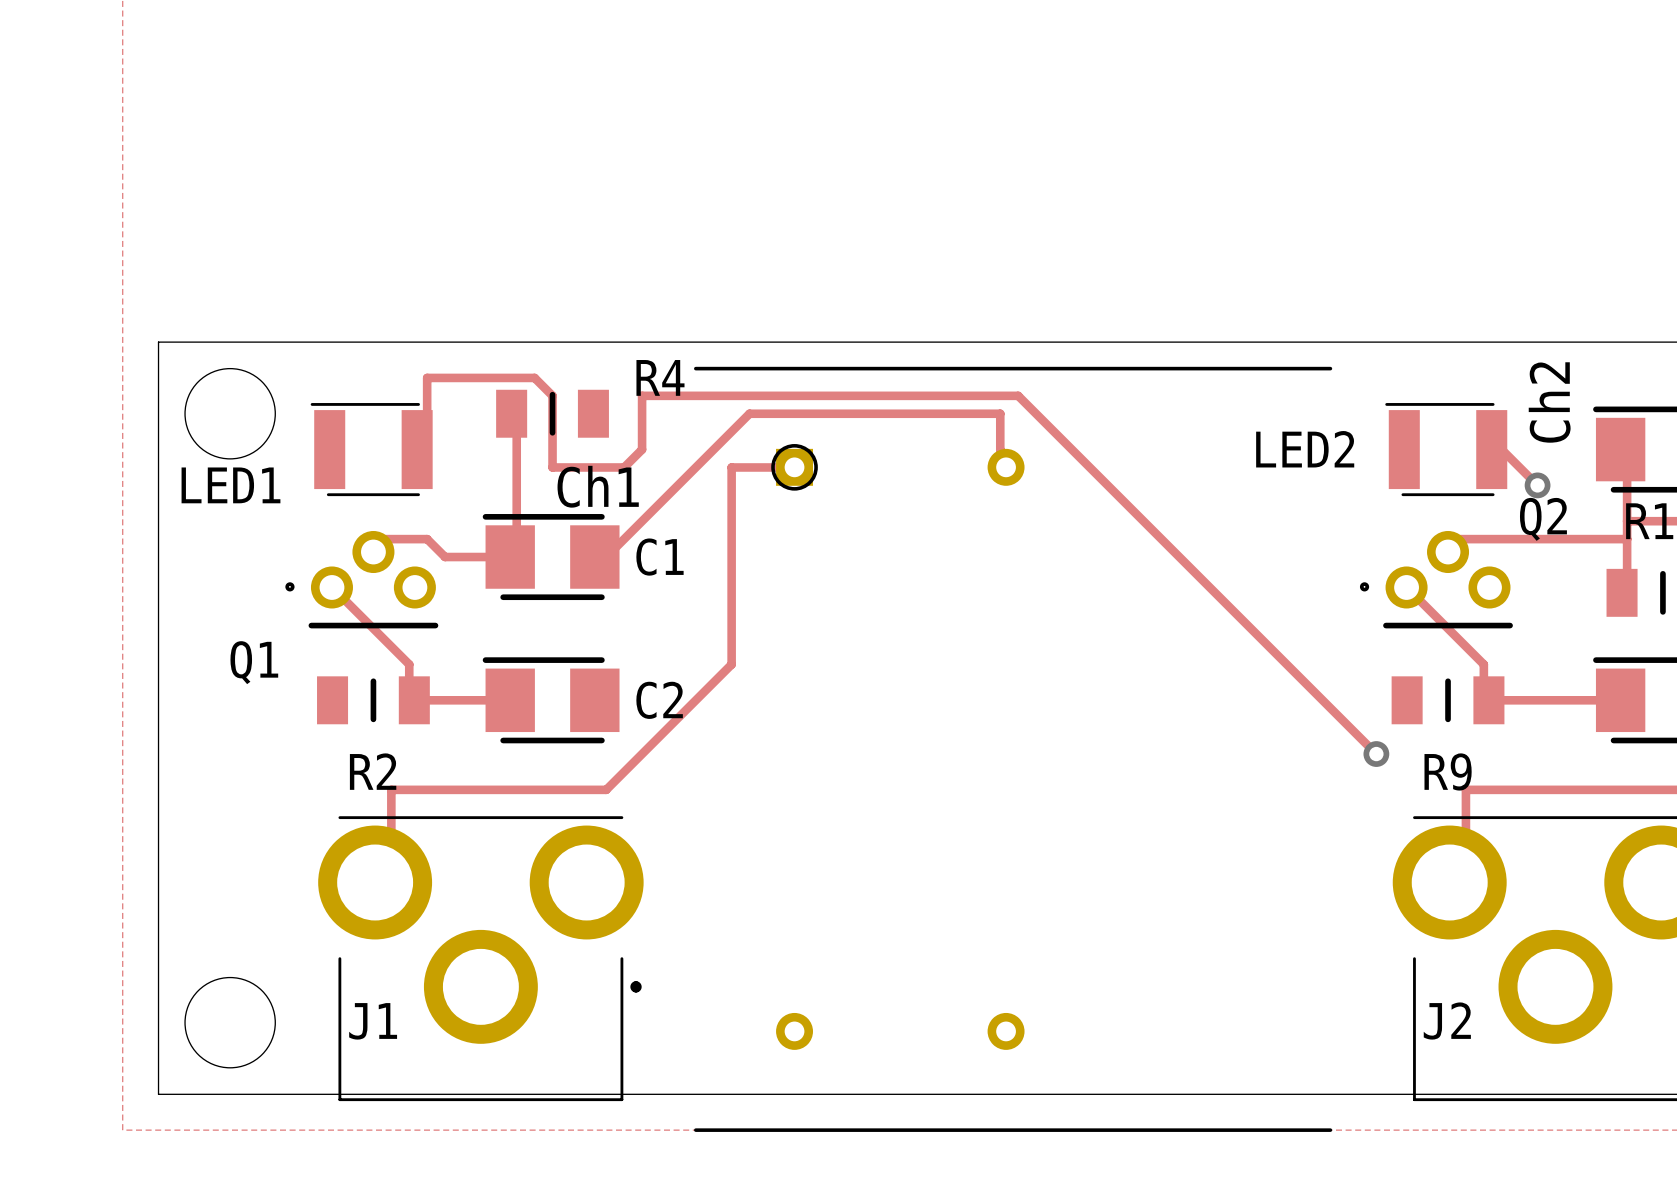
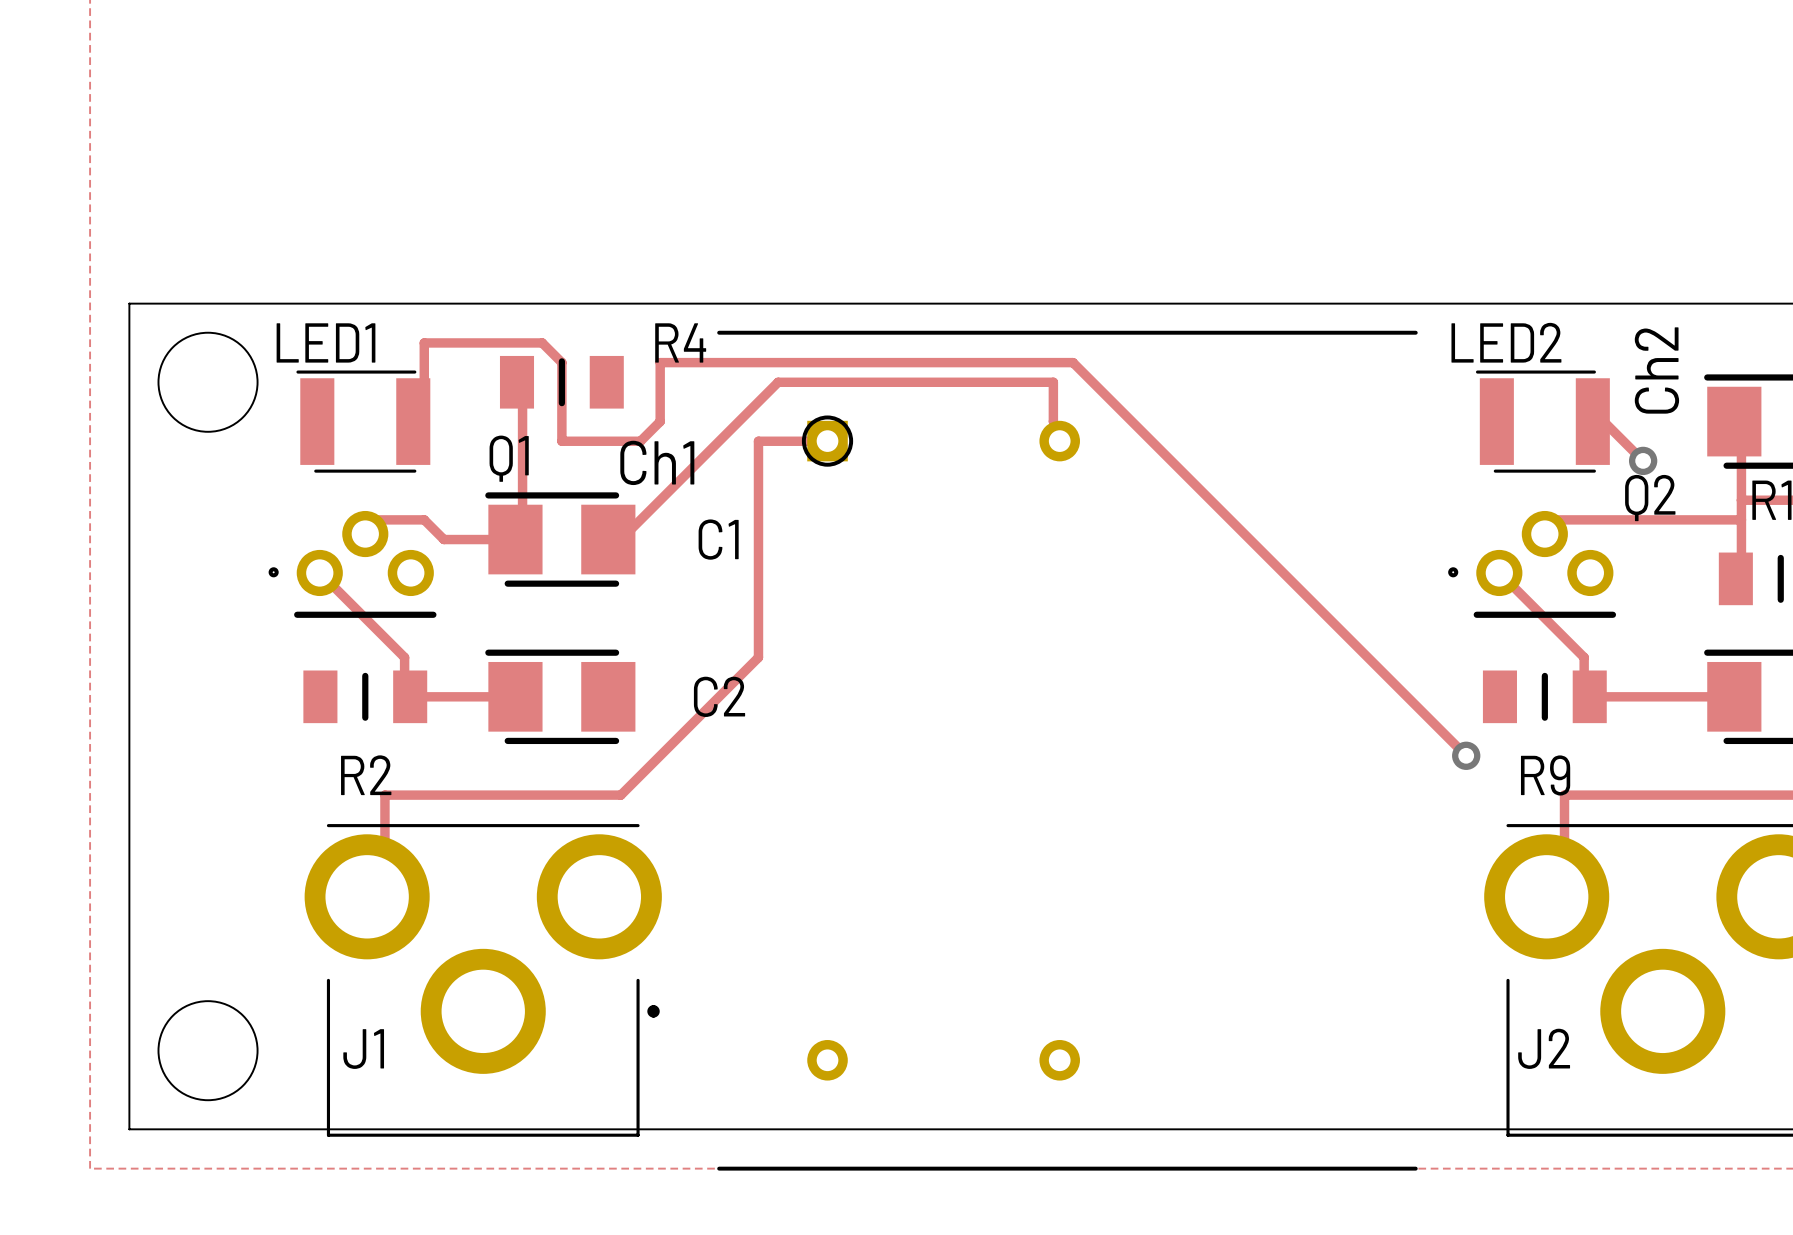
LED2 name position: LED2 (1305, 449) -> LED2 (1506, 342)
LED1 name position: LED1 (230, 485) -> LED1 (326, 342)
text position: Ch1 (598, 486) -> Ch1 (657, 462)
C1 name position: C1 (659, 557) -> C1 (718, 539)
Q1 name position: Q1 (254, 662) -> Q1 (509, 458)
C2 name position: C2 (659, 700) -> C2 (719, 696)

